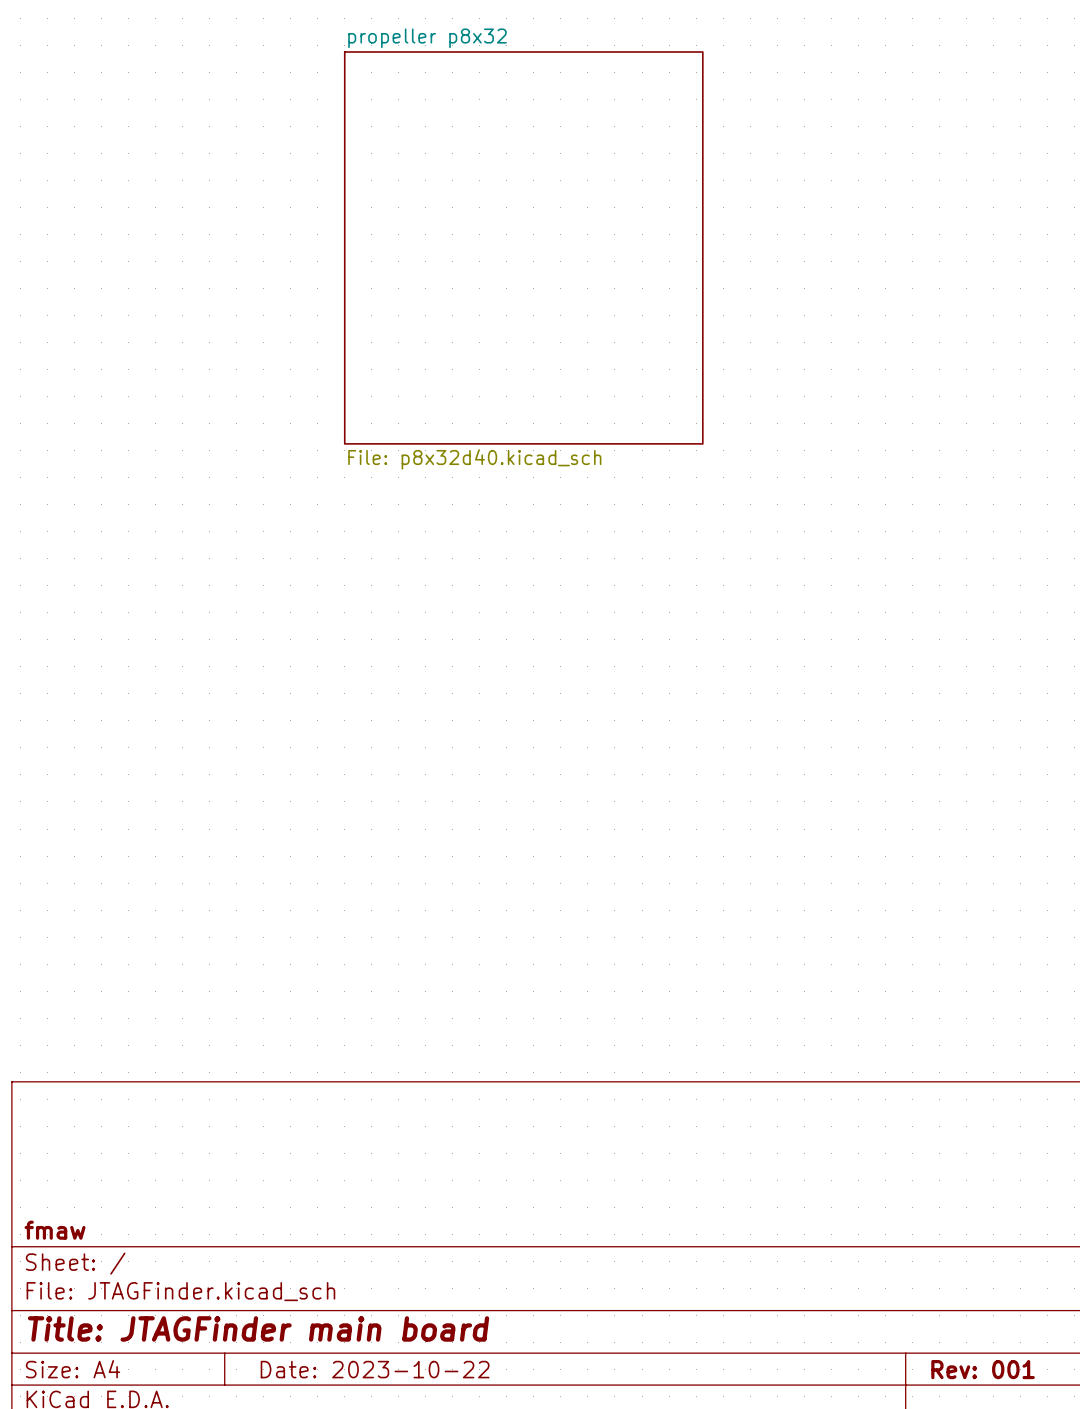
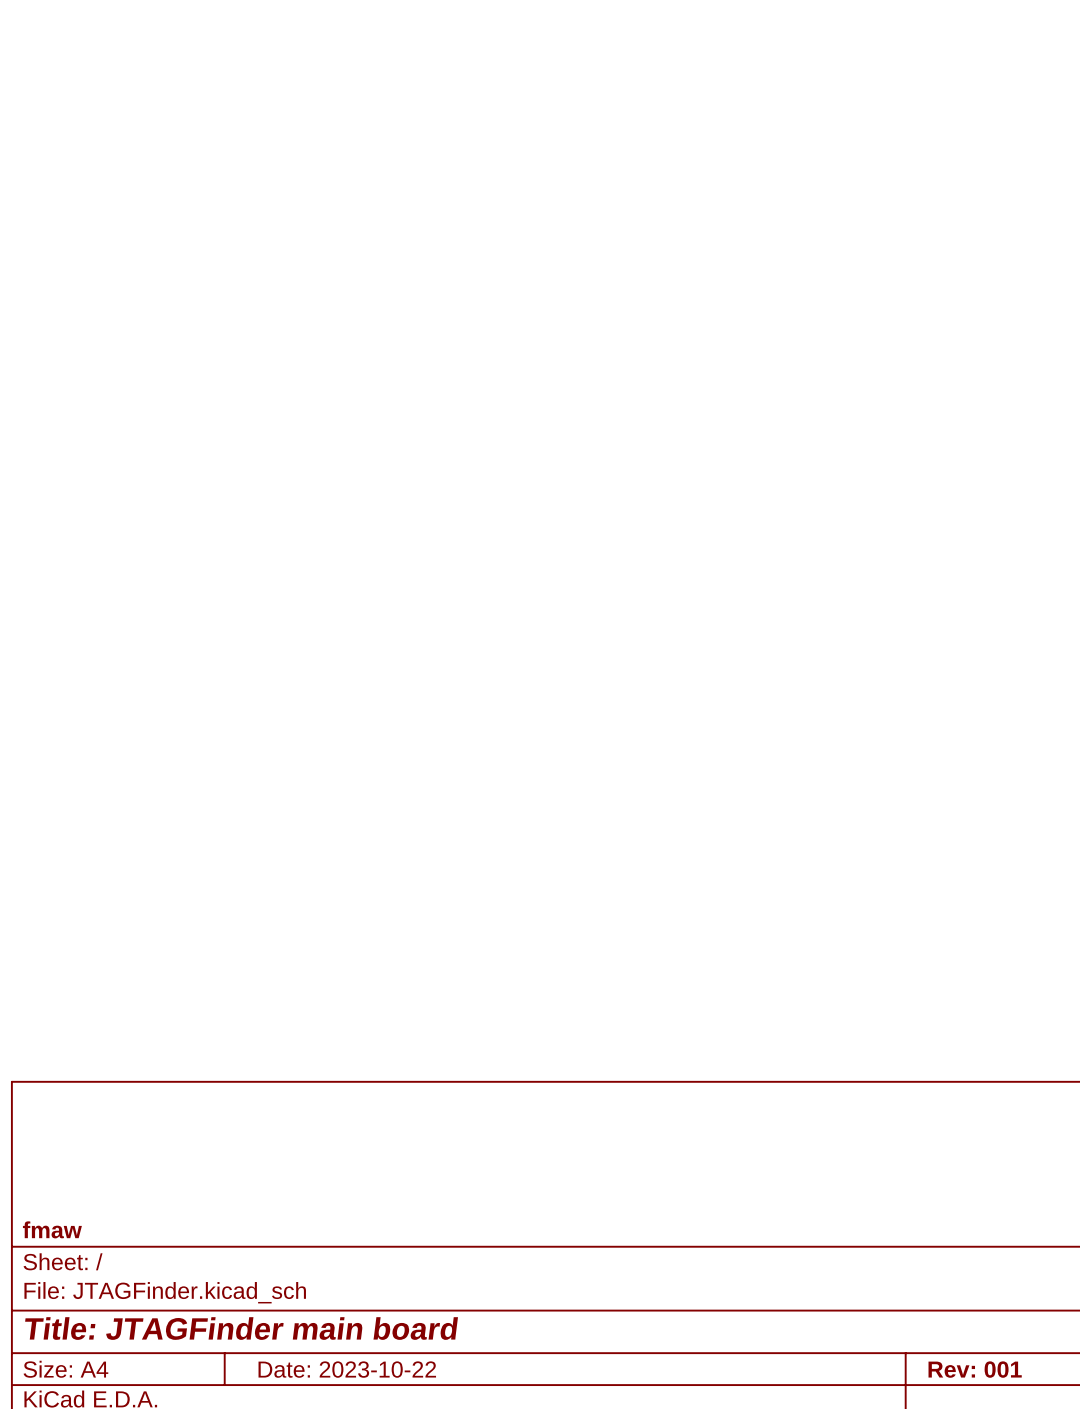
sheet propeller p8x32: File: p8x32d40.kicad_sch (523, 247) -> none

